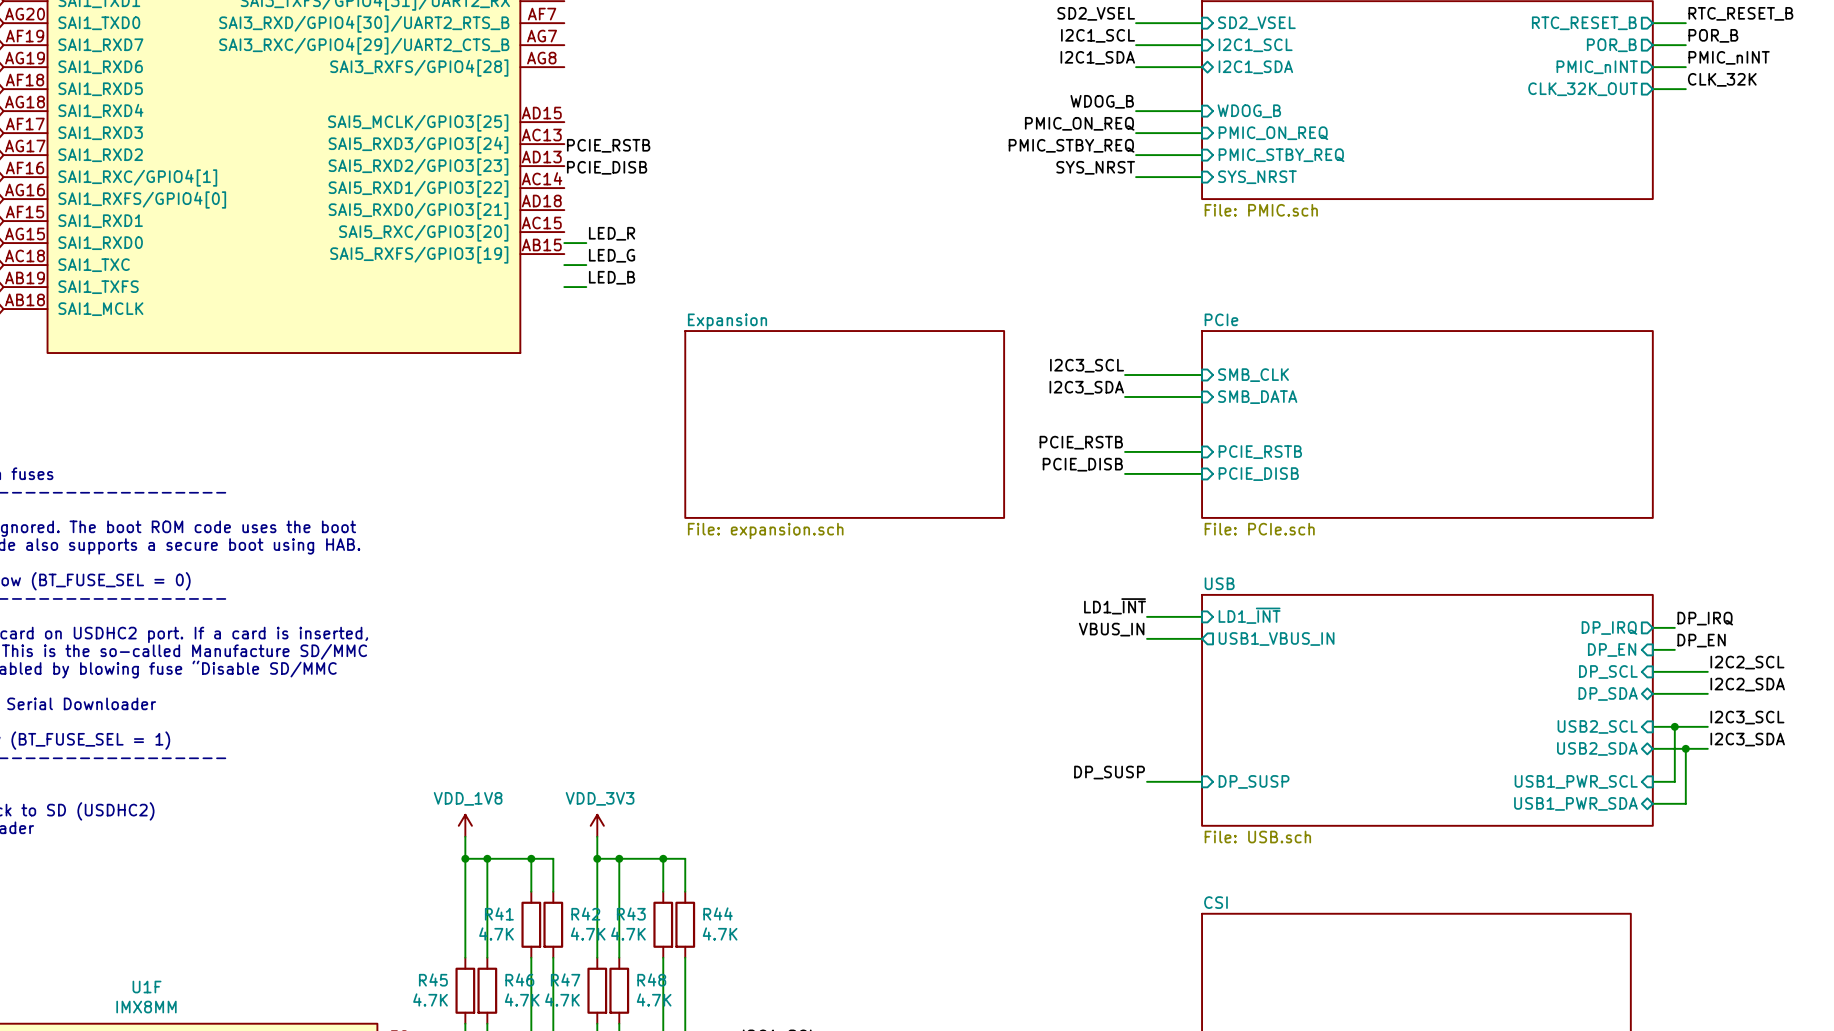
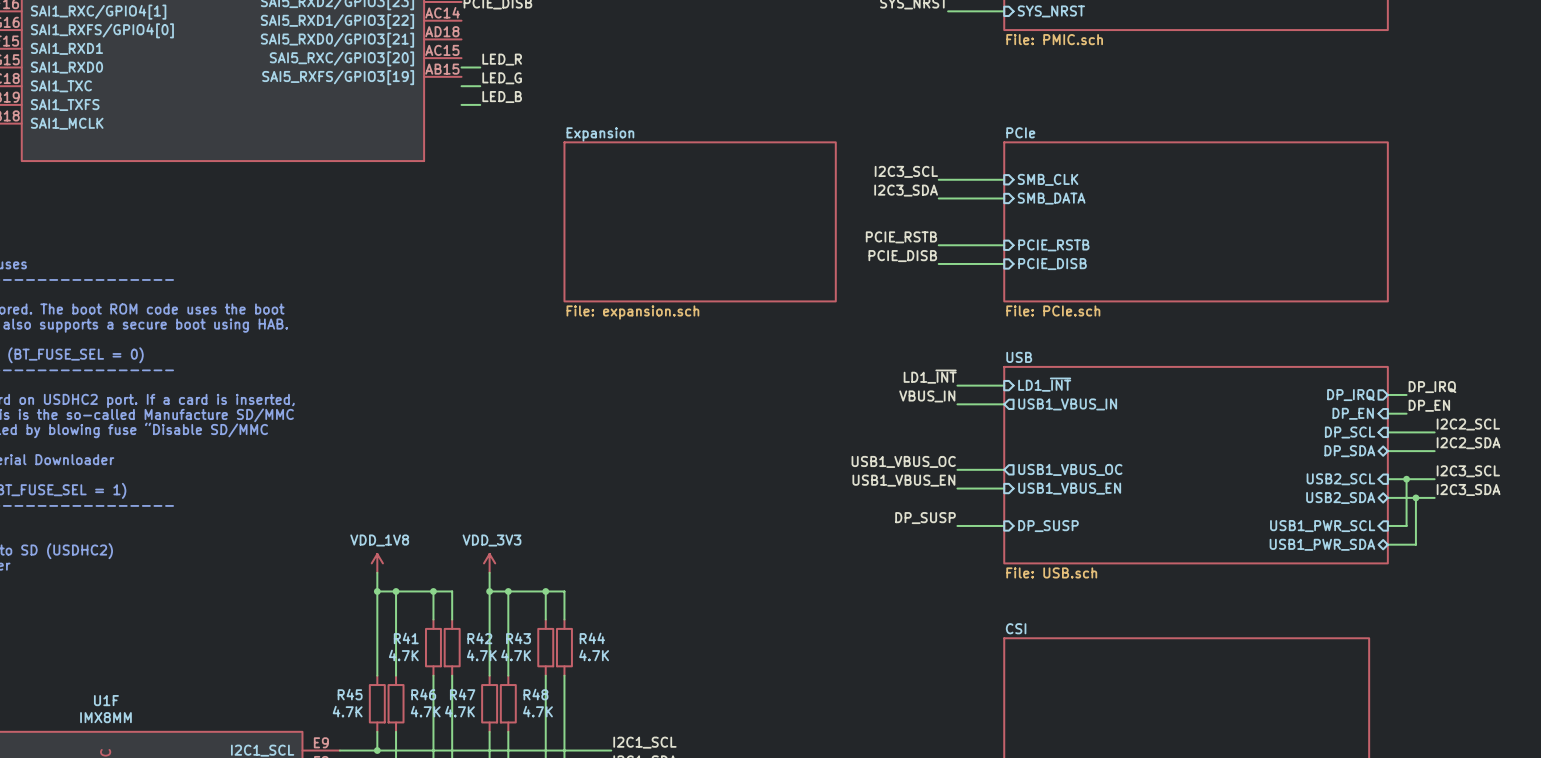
label: none -> USB1_VBUS_OC (903, 461)
wire: none -> (957, 469) (1004, 469)
sheet pin: none -> USB1_VBUS_OC (1070, 469)
label: none -> USB1_VBUS_EN (903, 480)
wire: none -> (957, 488) (1004, 488)
sheet pin: none -> USB1_VBUS_EN (1069, 488)

